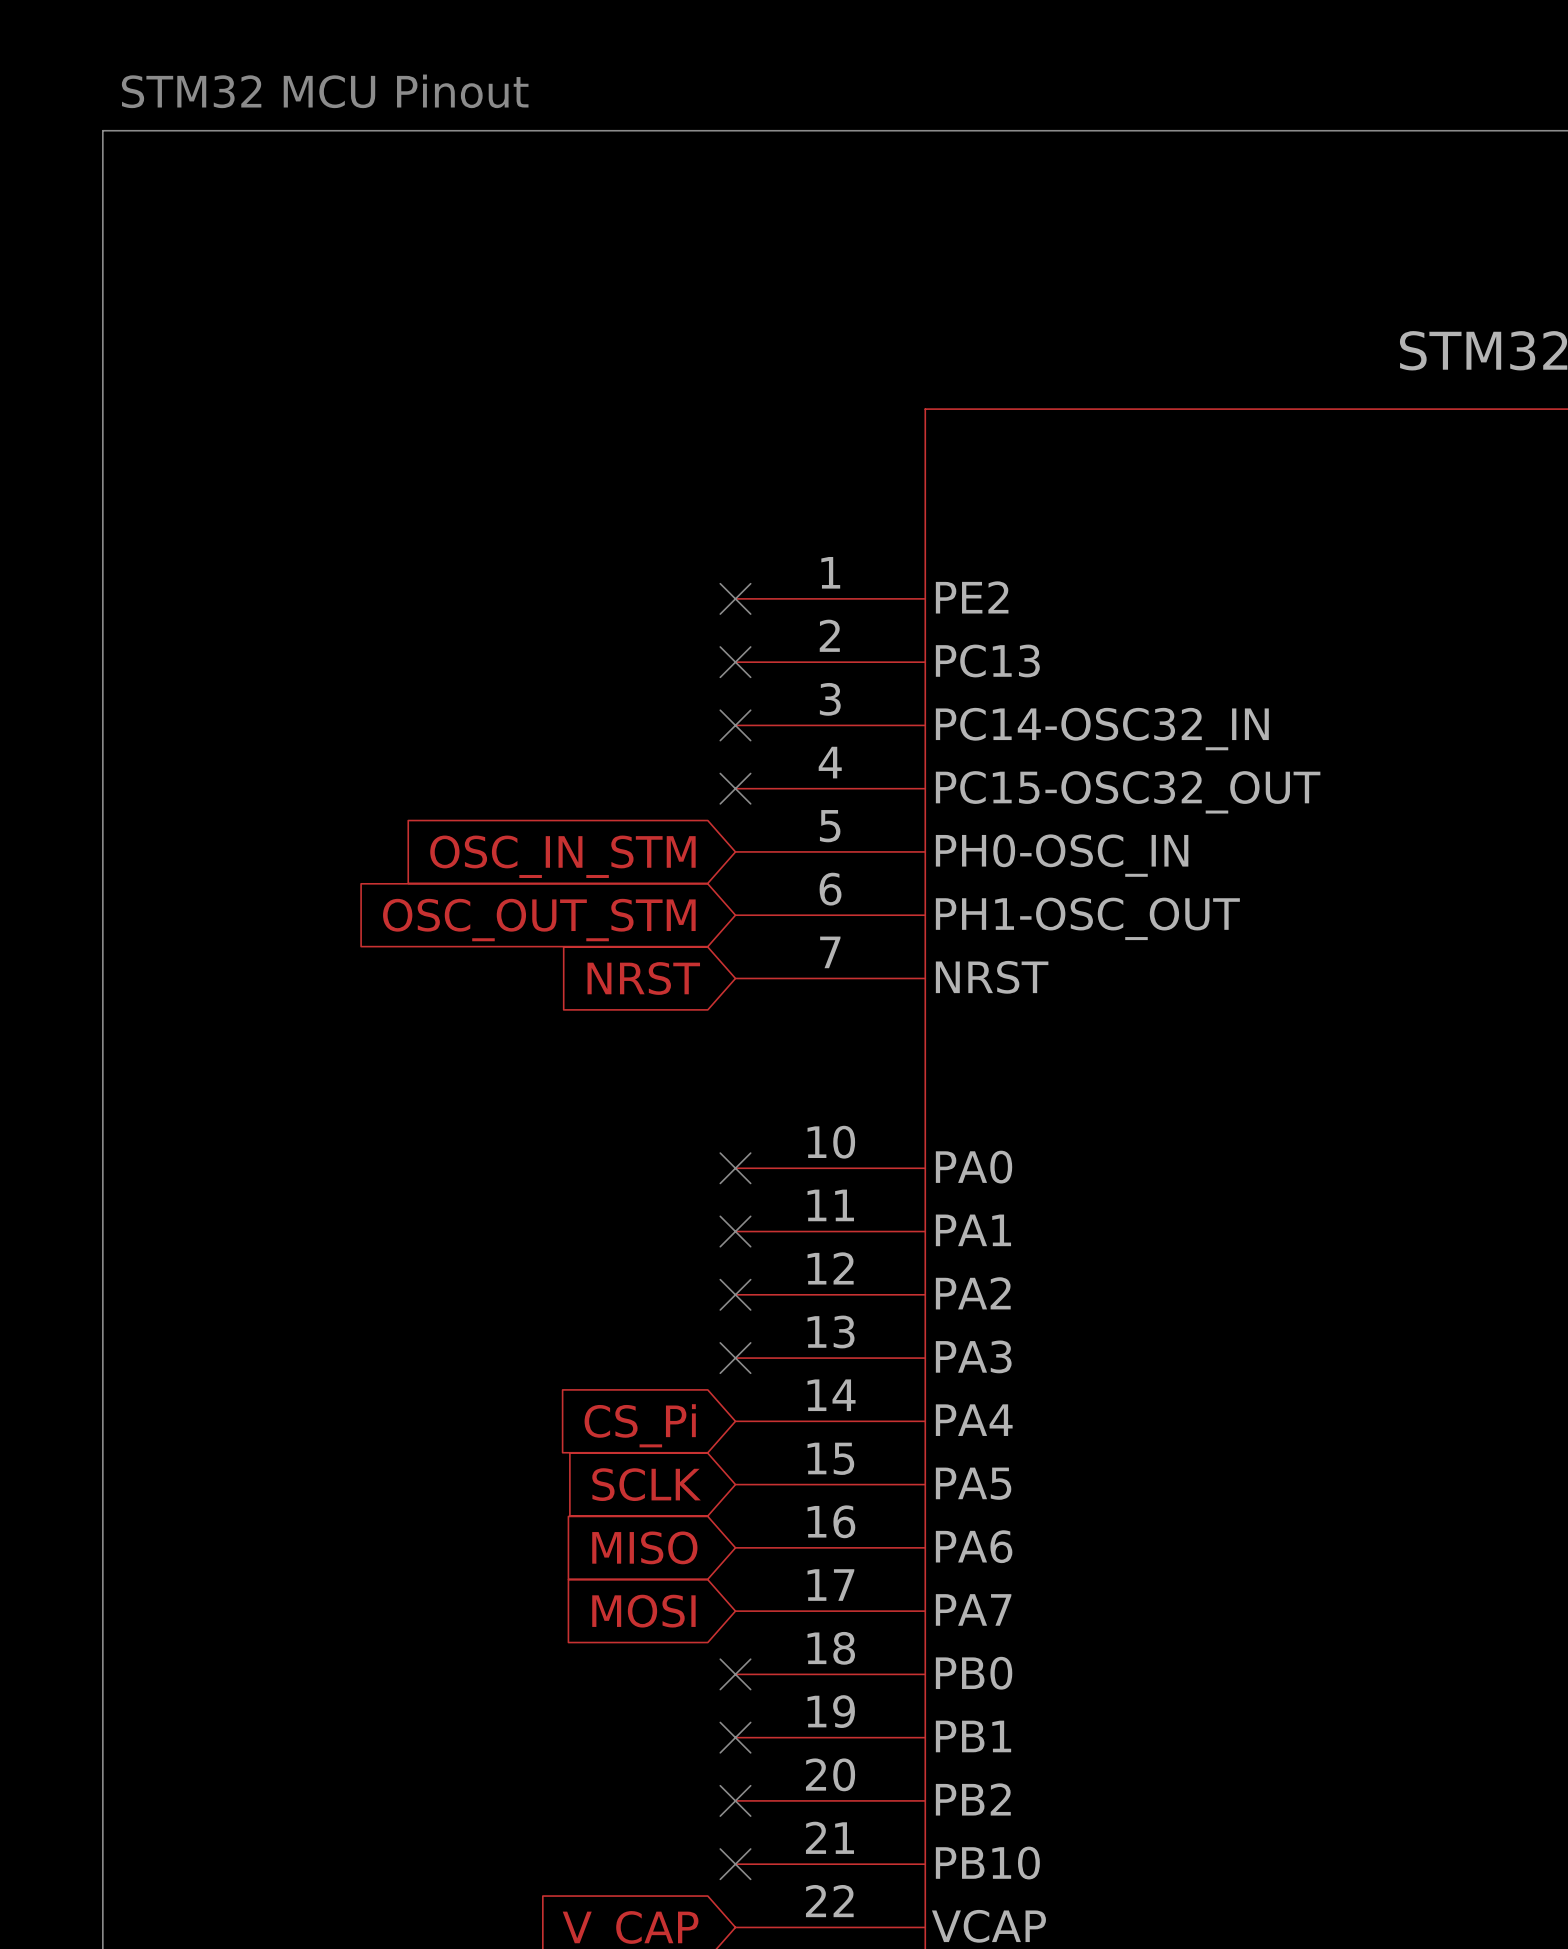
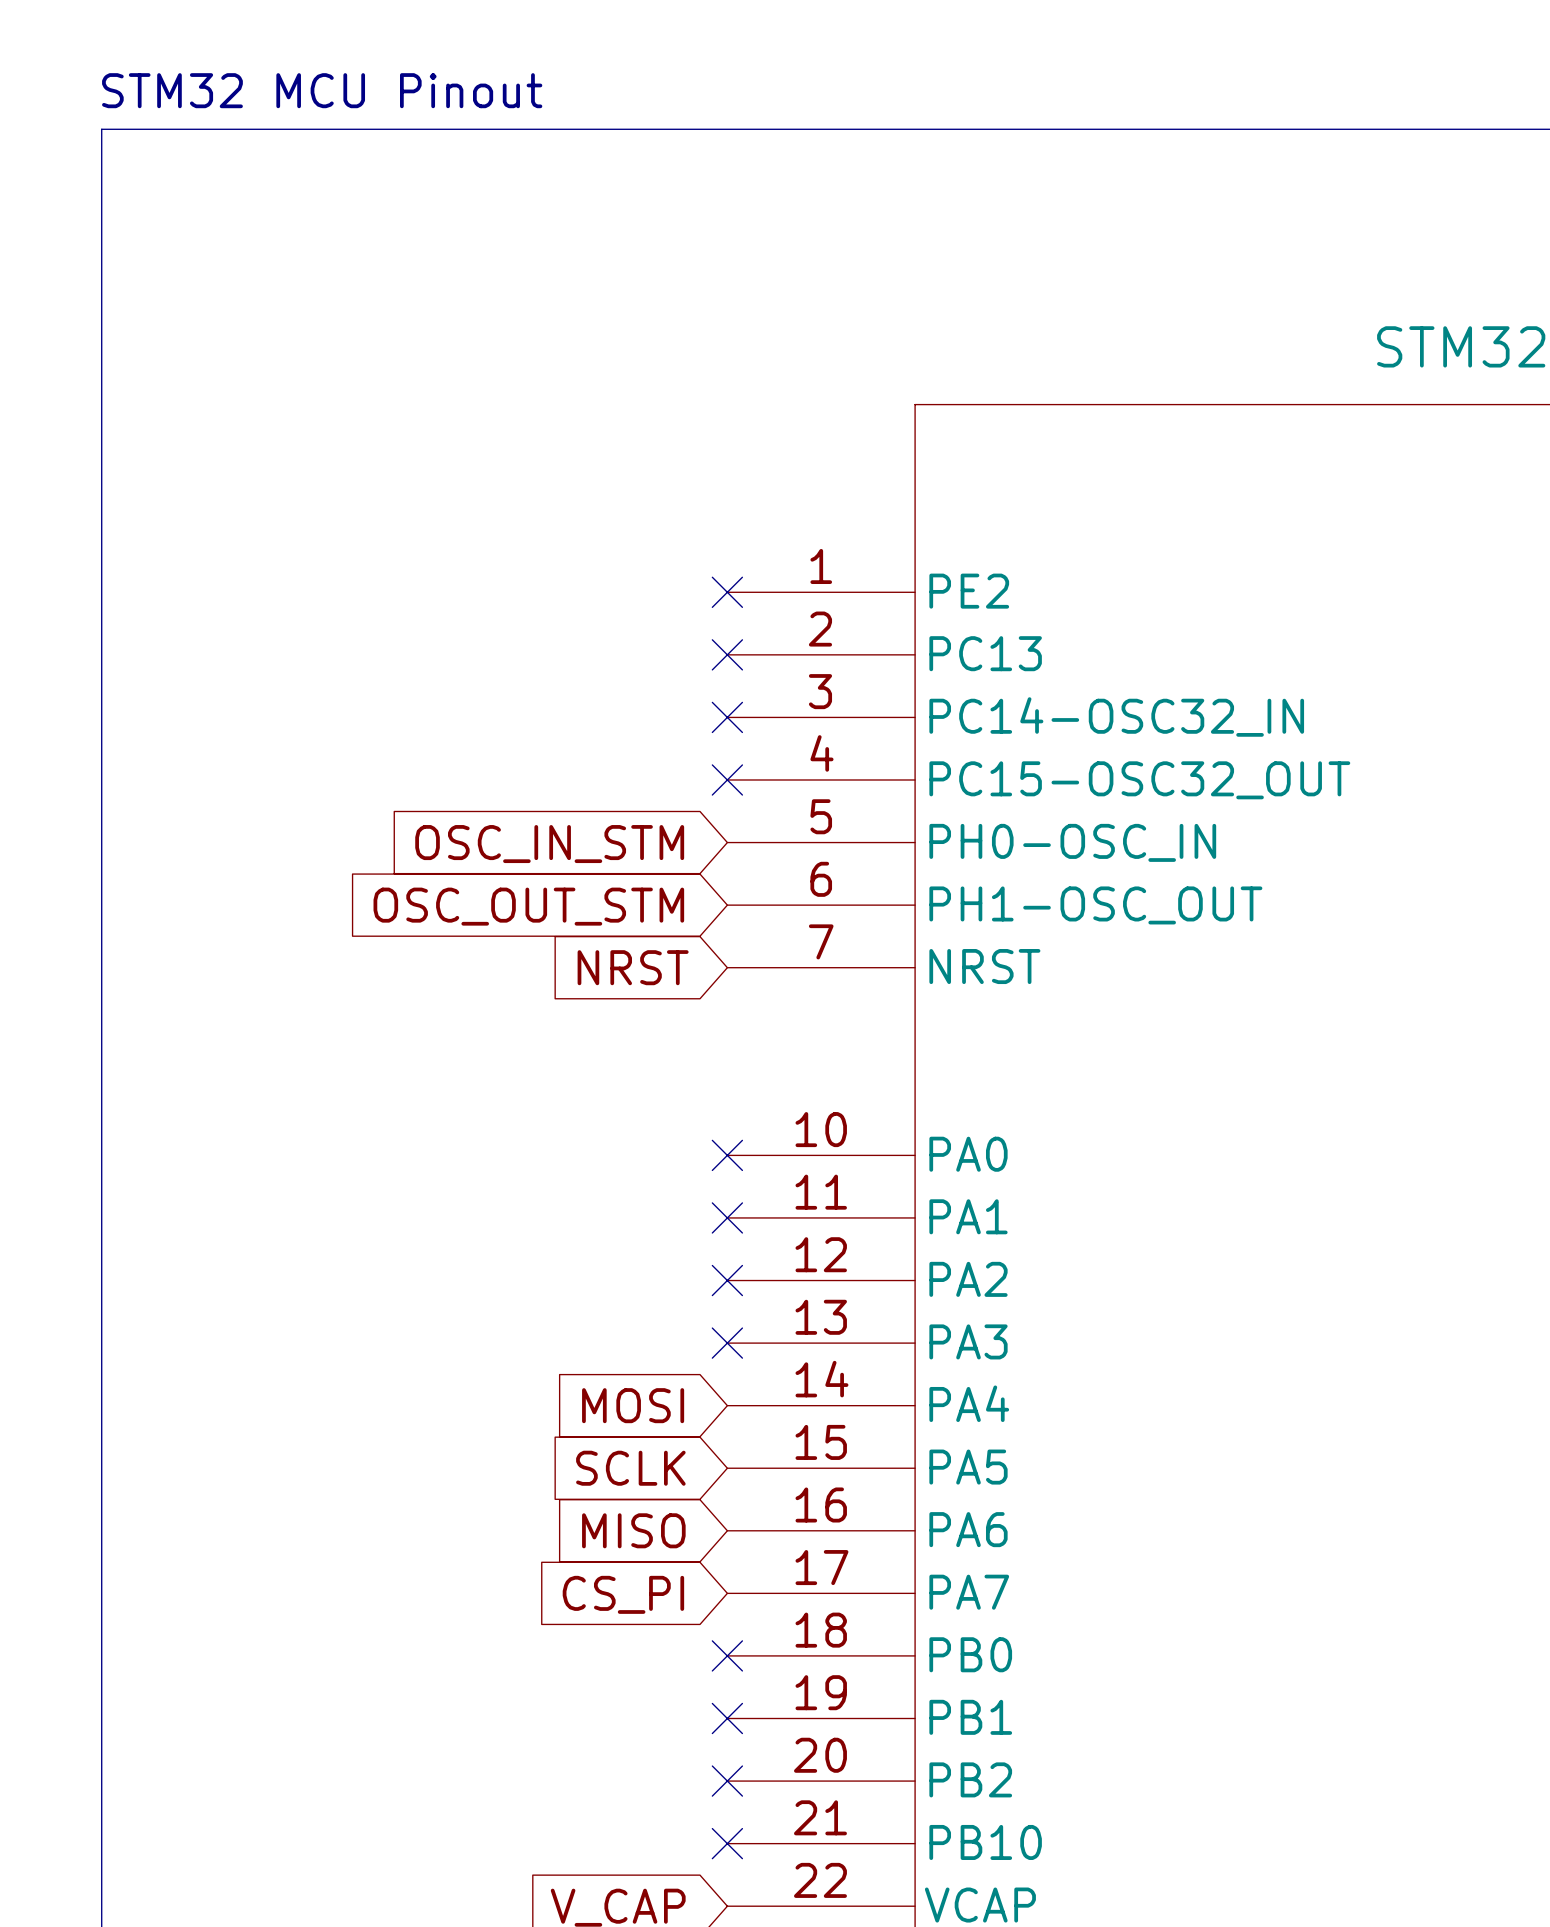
global label: CS_Pi (640, 1425) -> MOSI (633, 1405)
global label: MOSI (643, 1611) -> CS_PI (623, 1594)

